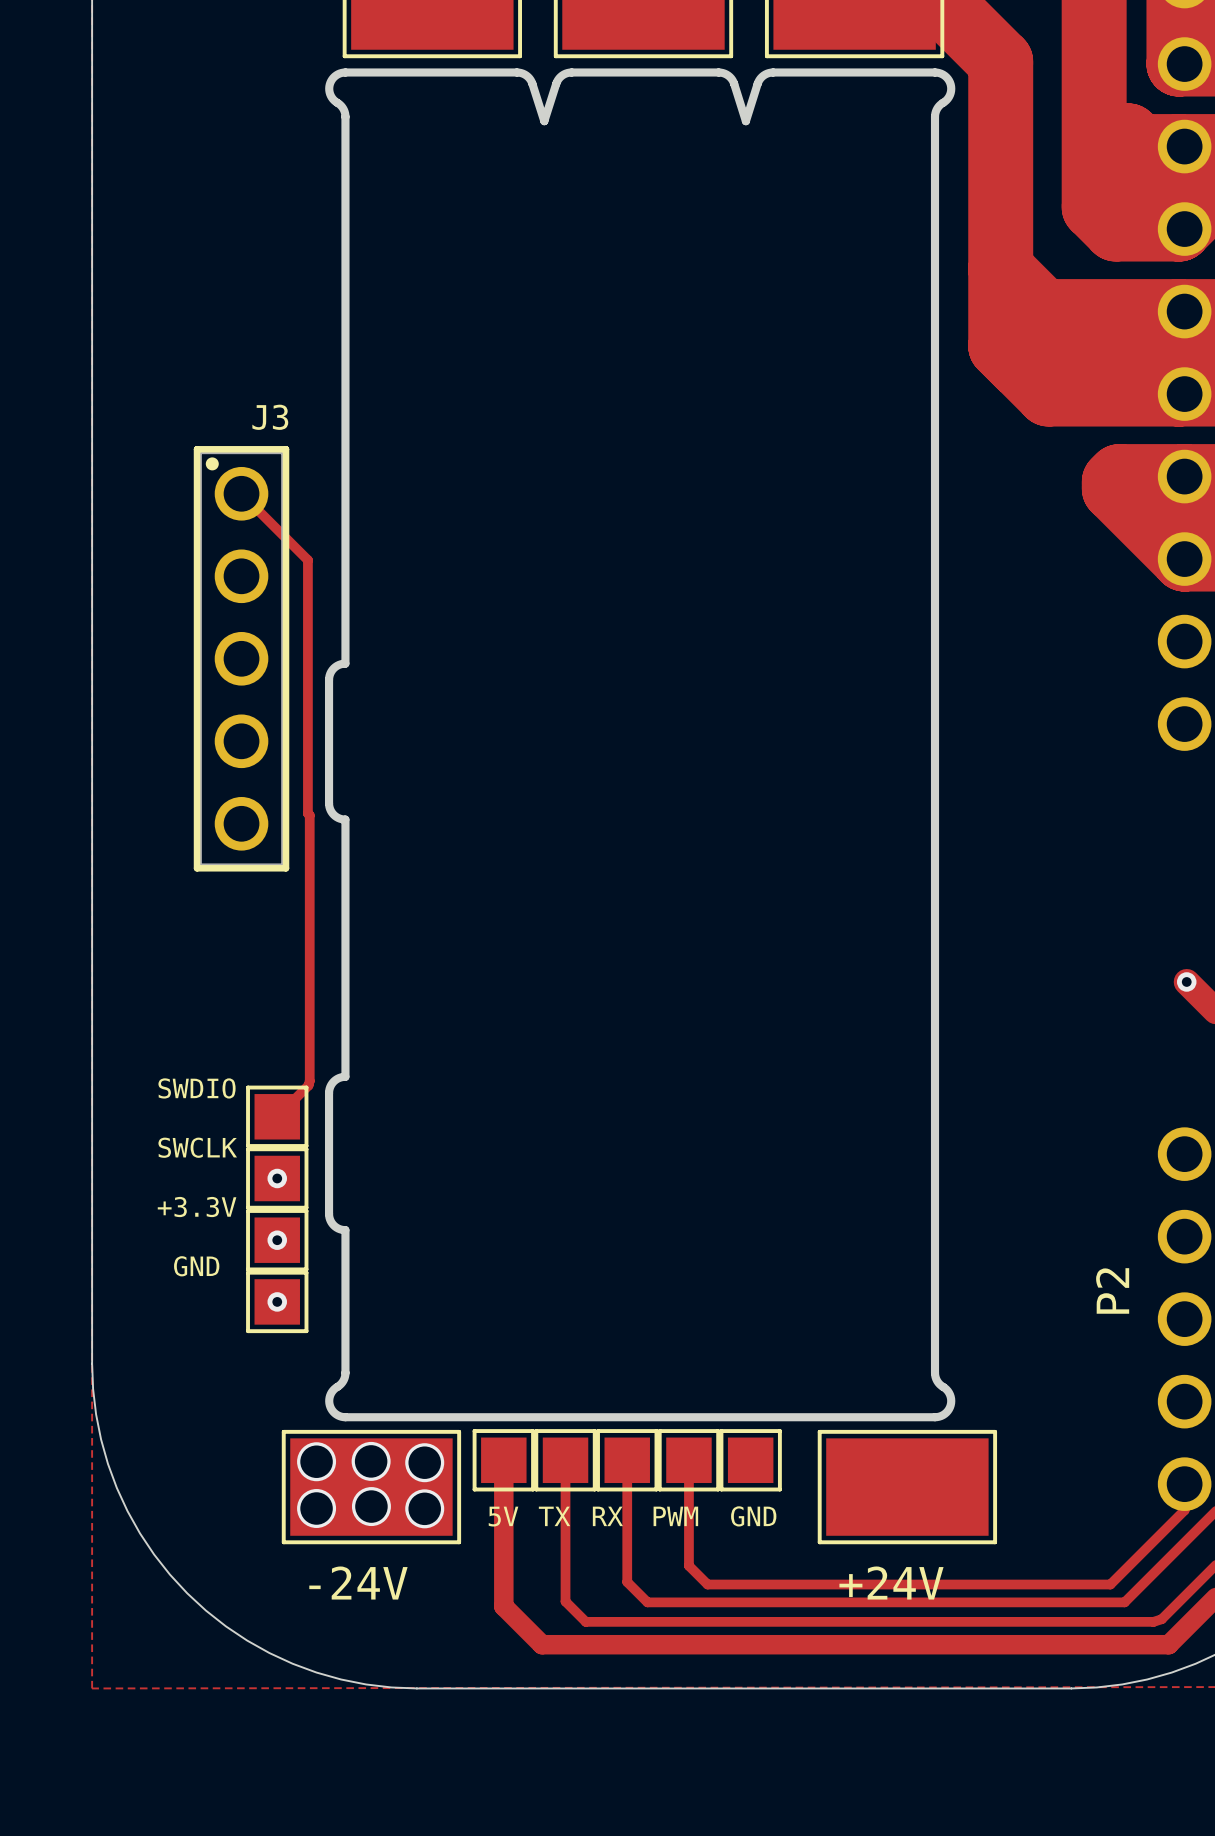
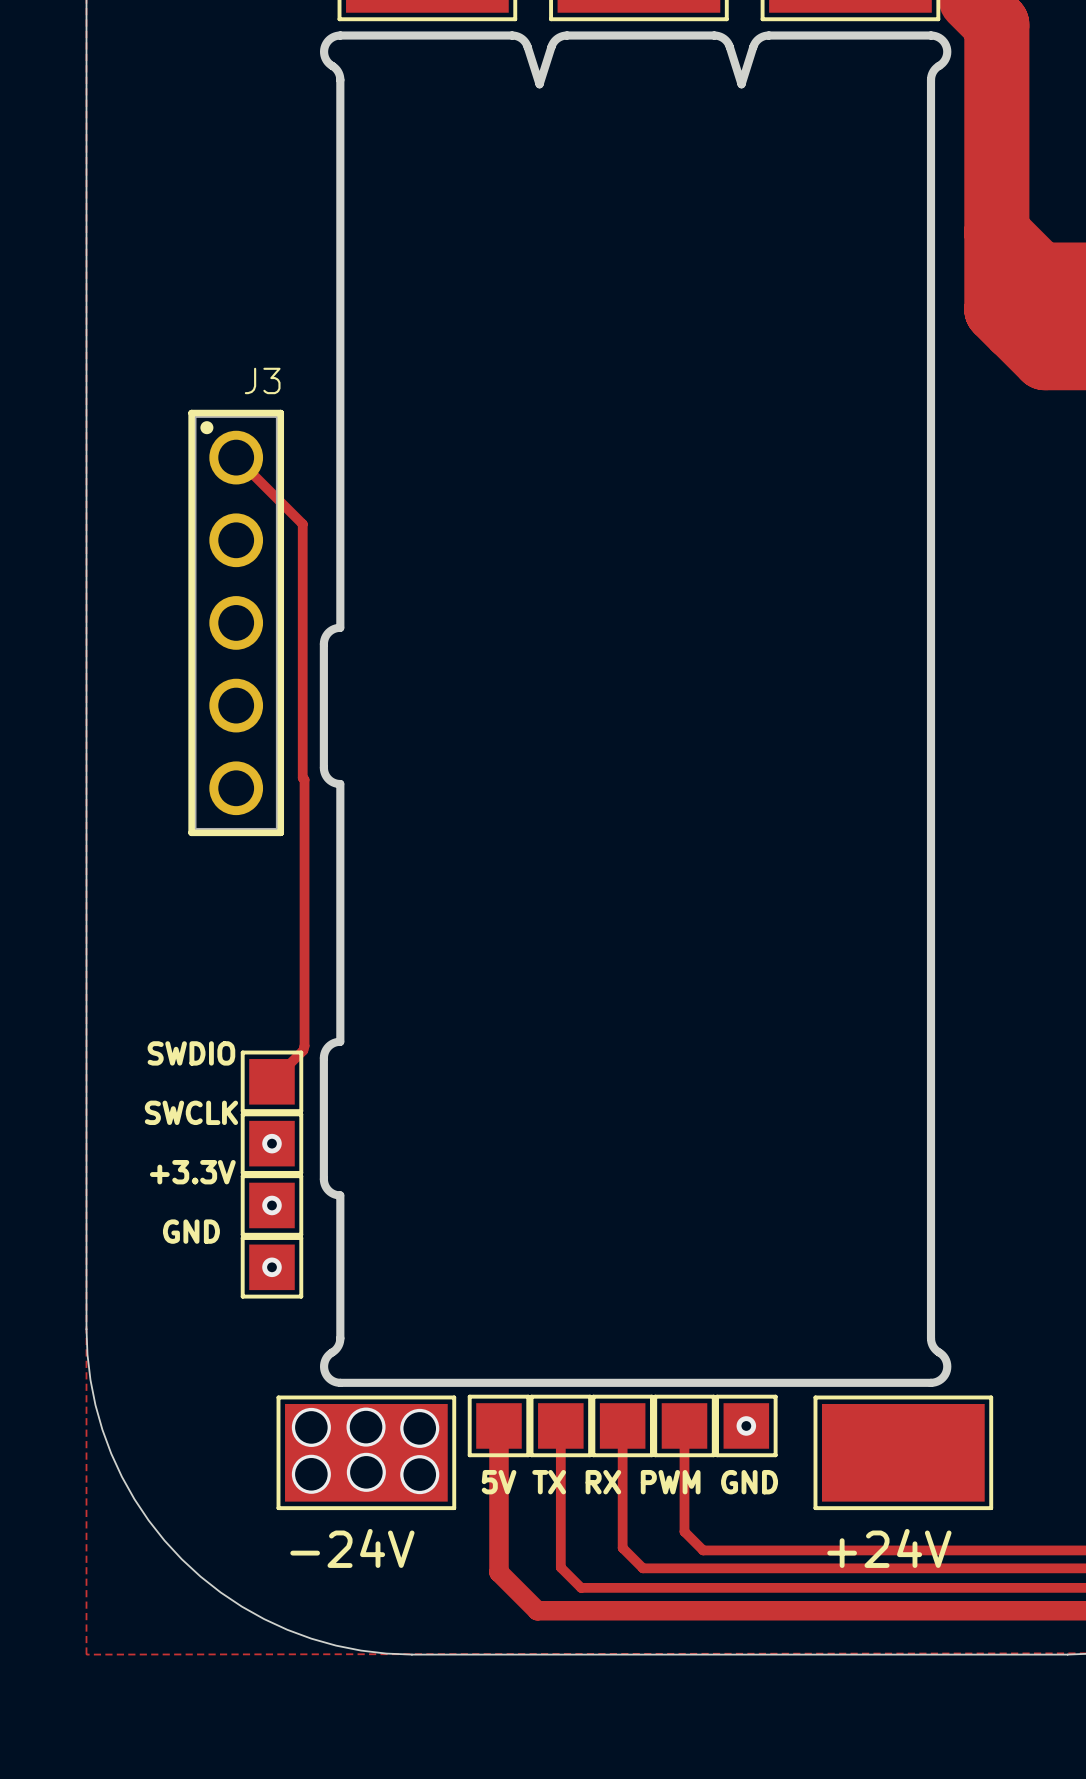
via: none -> (746, 1425)

